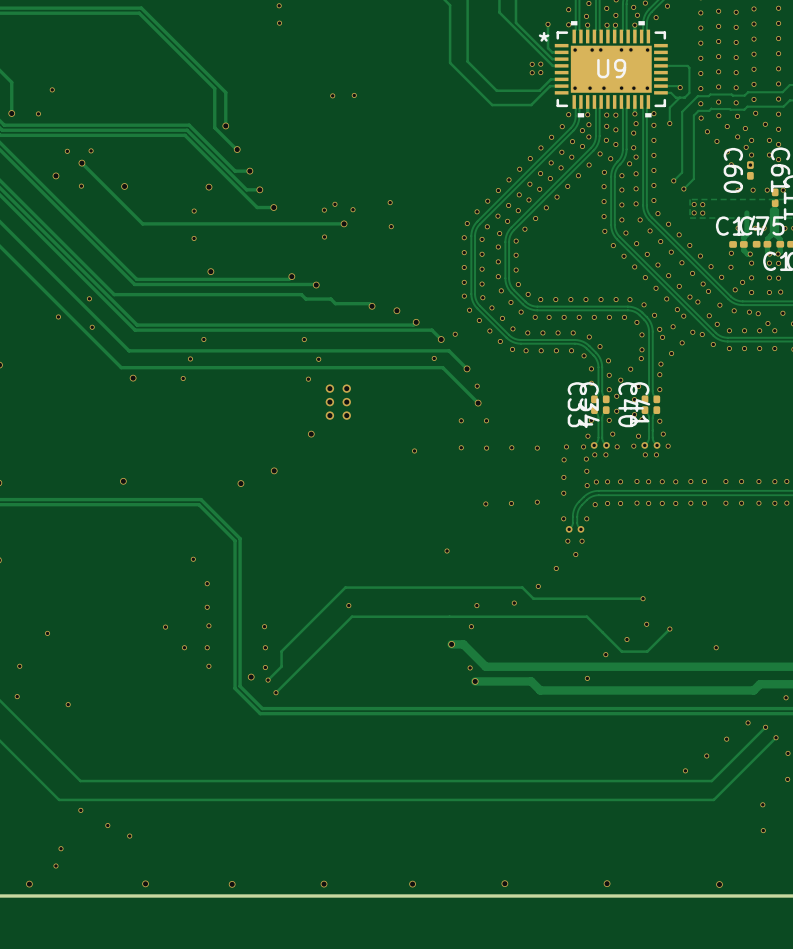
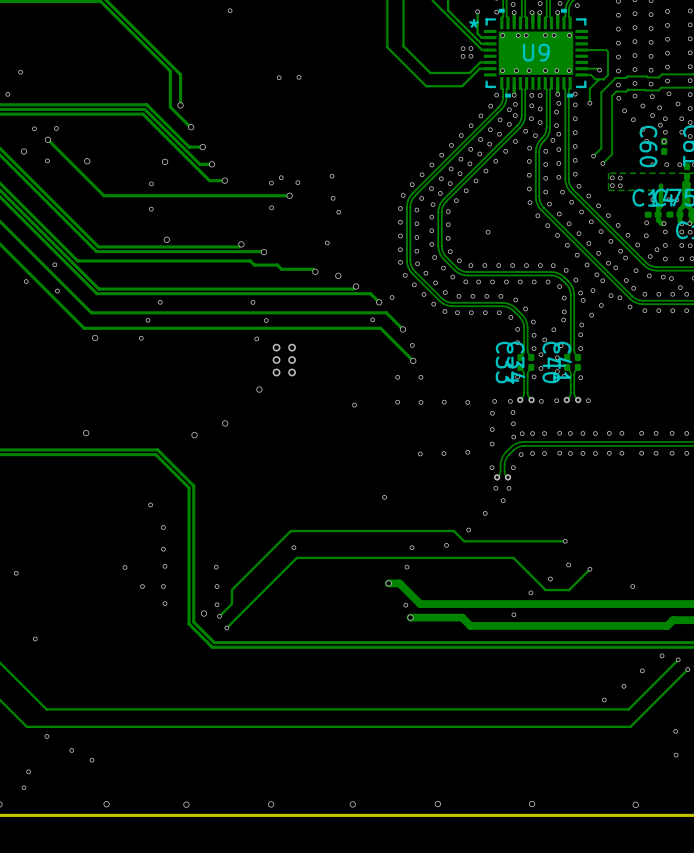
via: none -> (338, 212)
via: none -> (488, 232)
via: none -> (327, 242)
via: (612, 434) -> none
via: (663, 434) -> none
via: (587, 436) -> none
via: (638, 436) -> none
via: (594, 454) -> none
via: (605, 454) -> none
via: (645, 454) -> none
via: (656, 454) -> none

